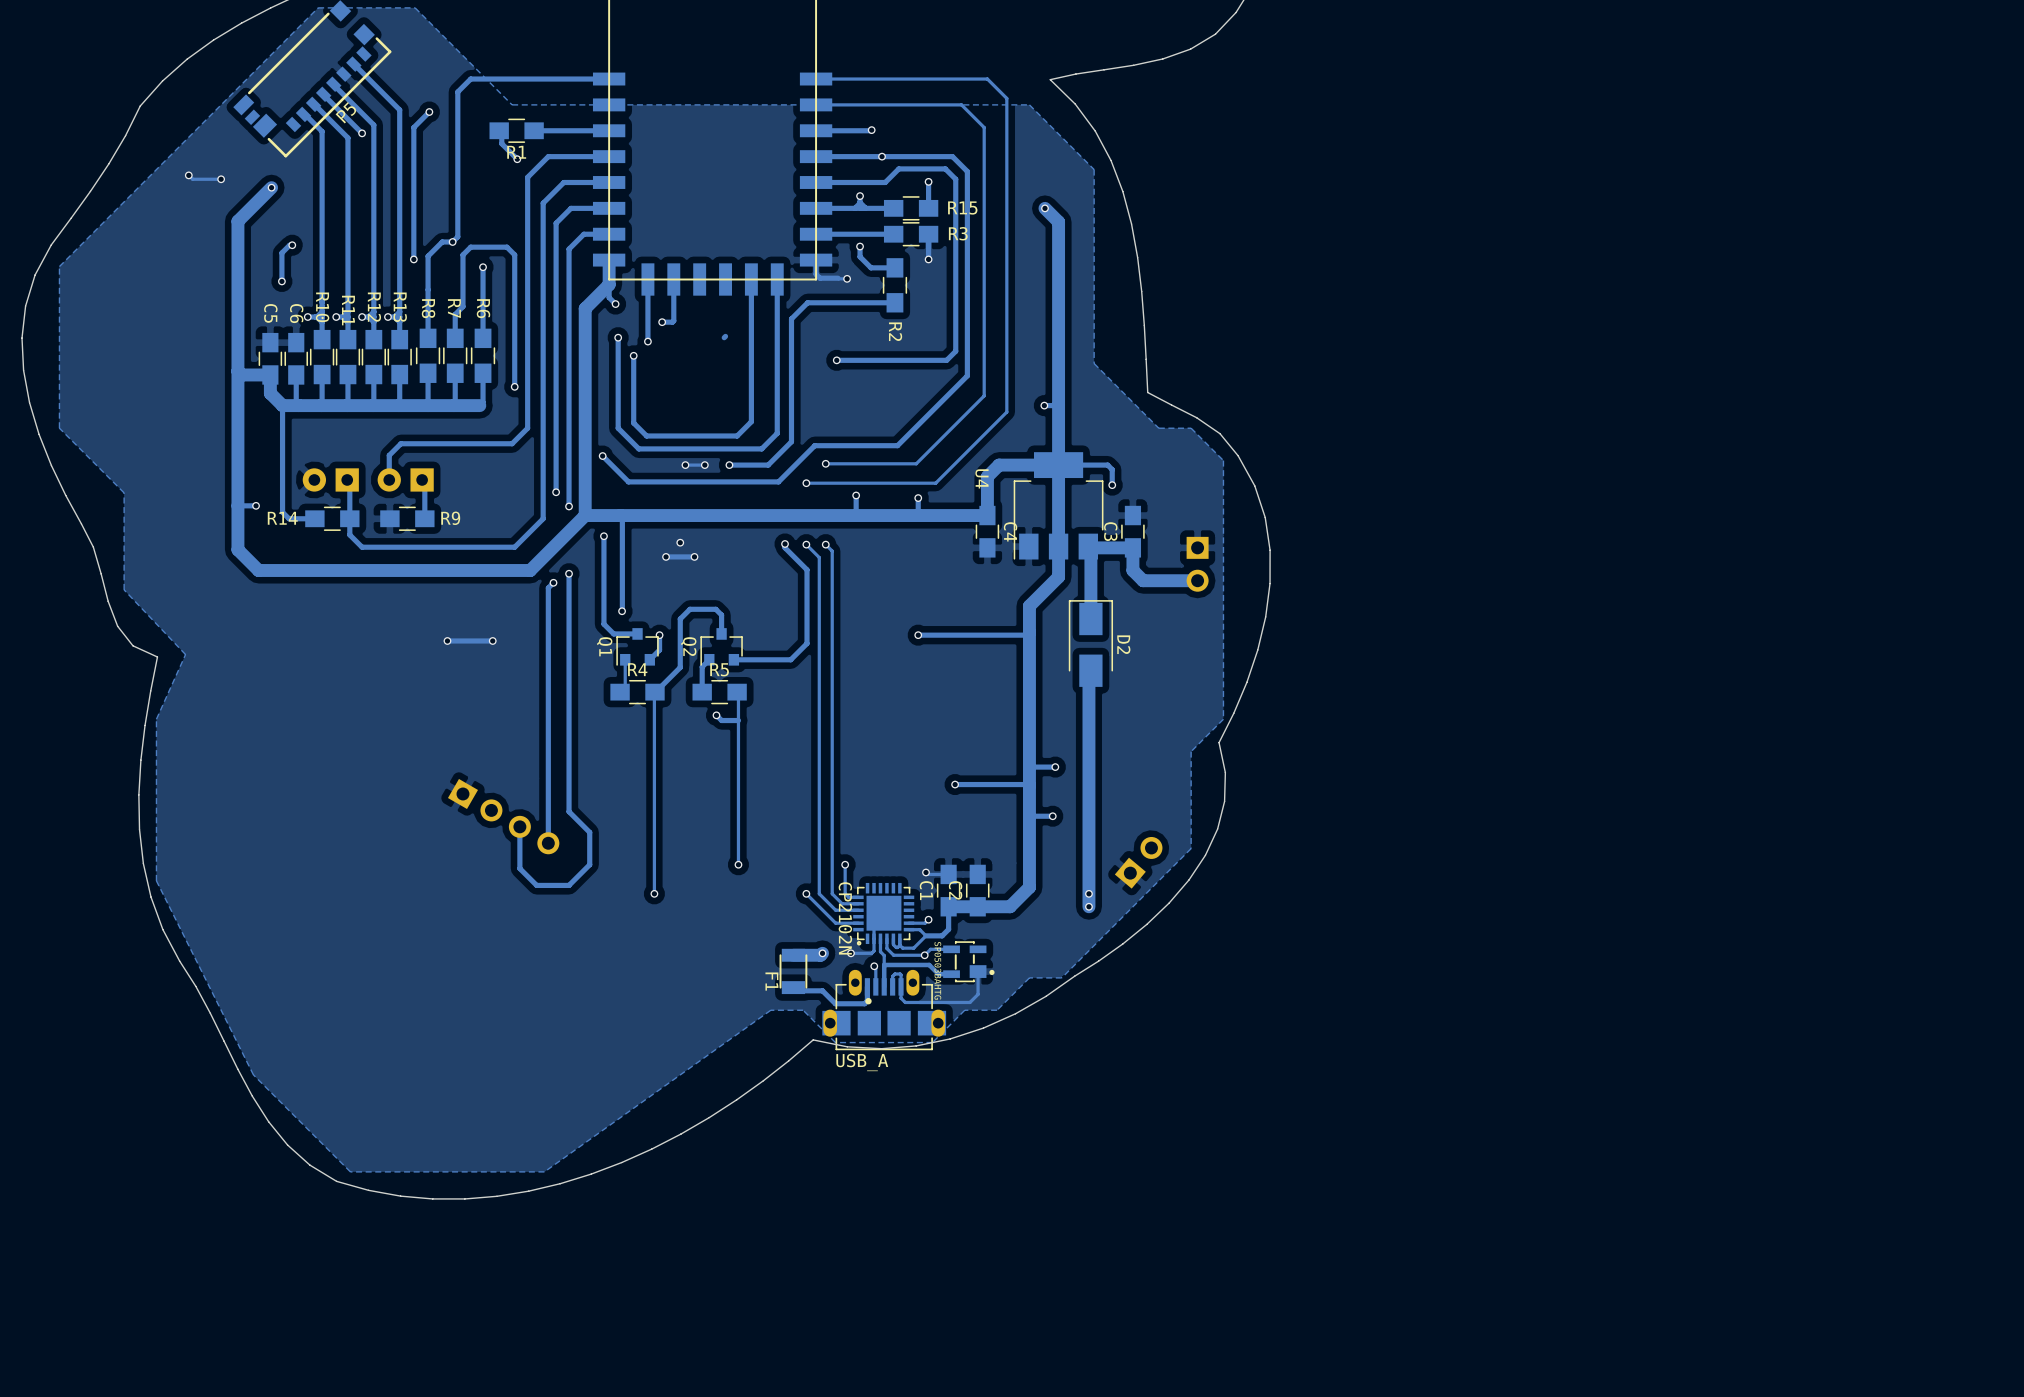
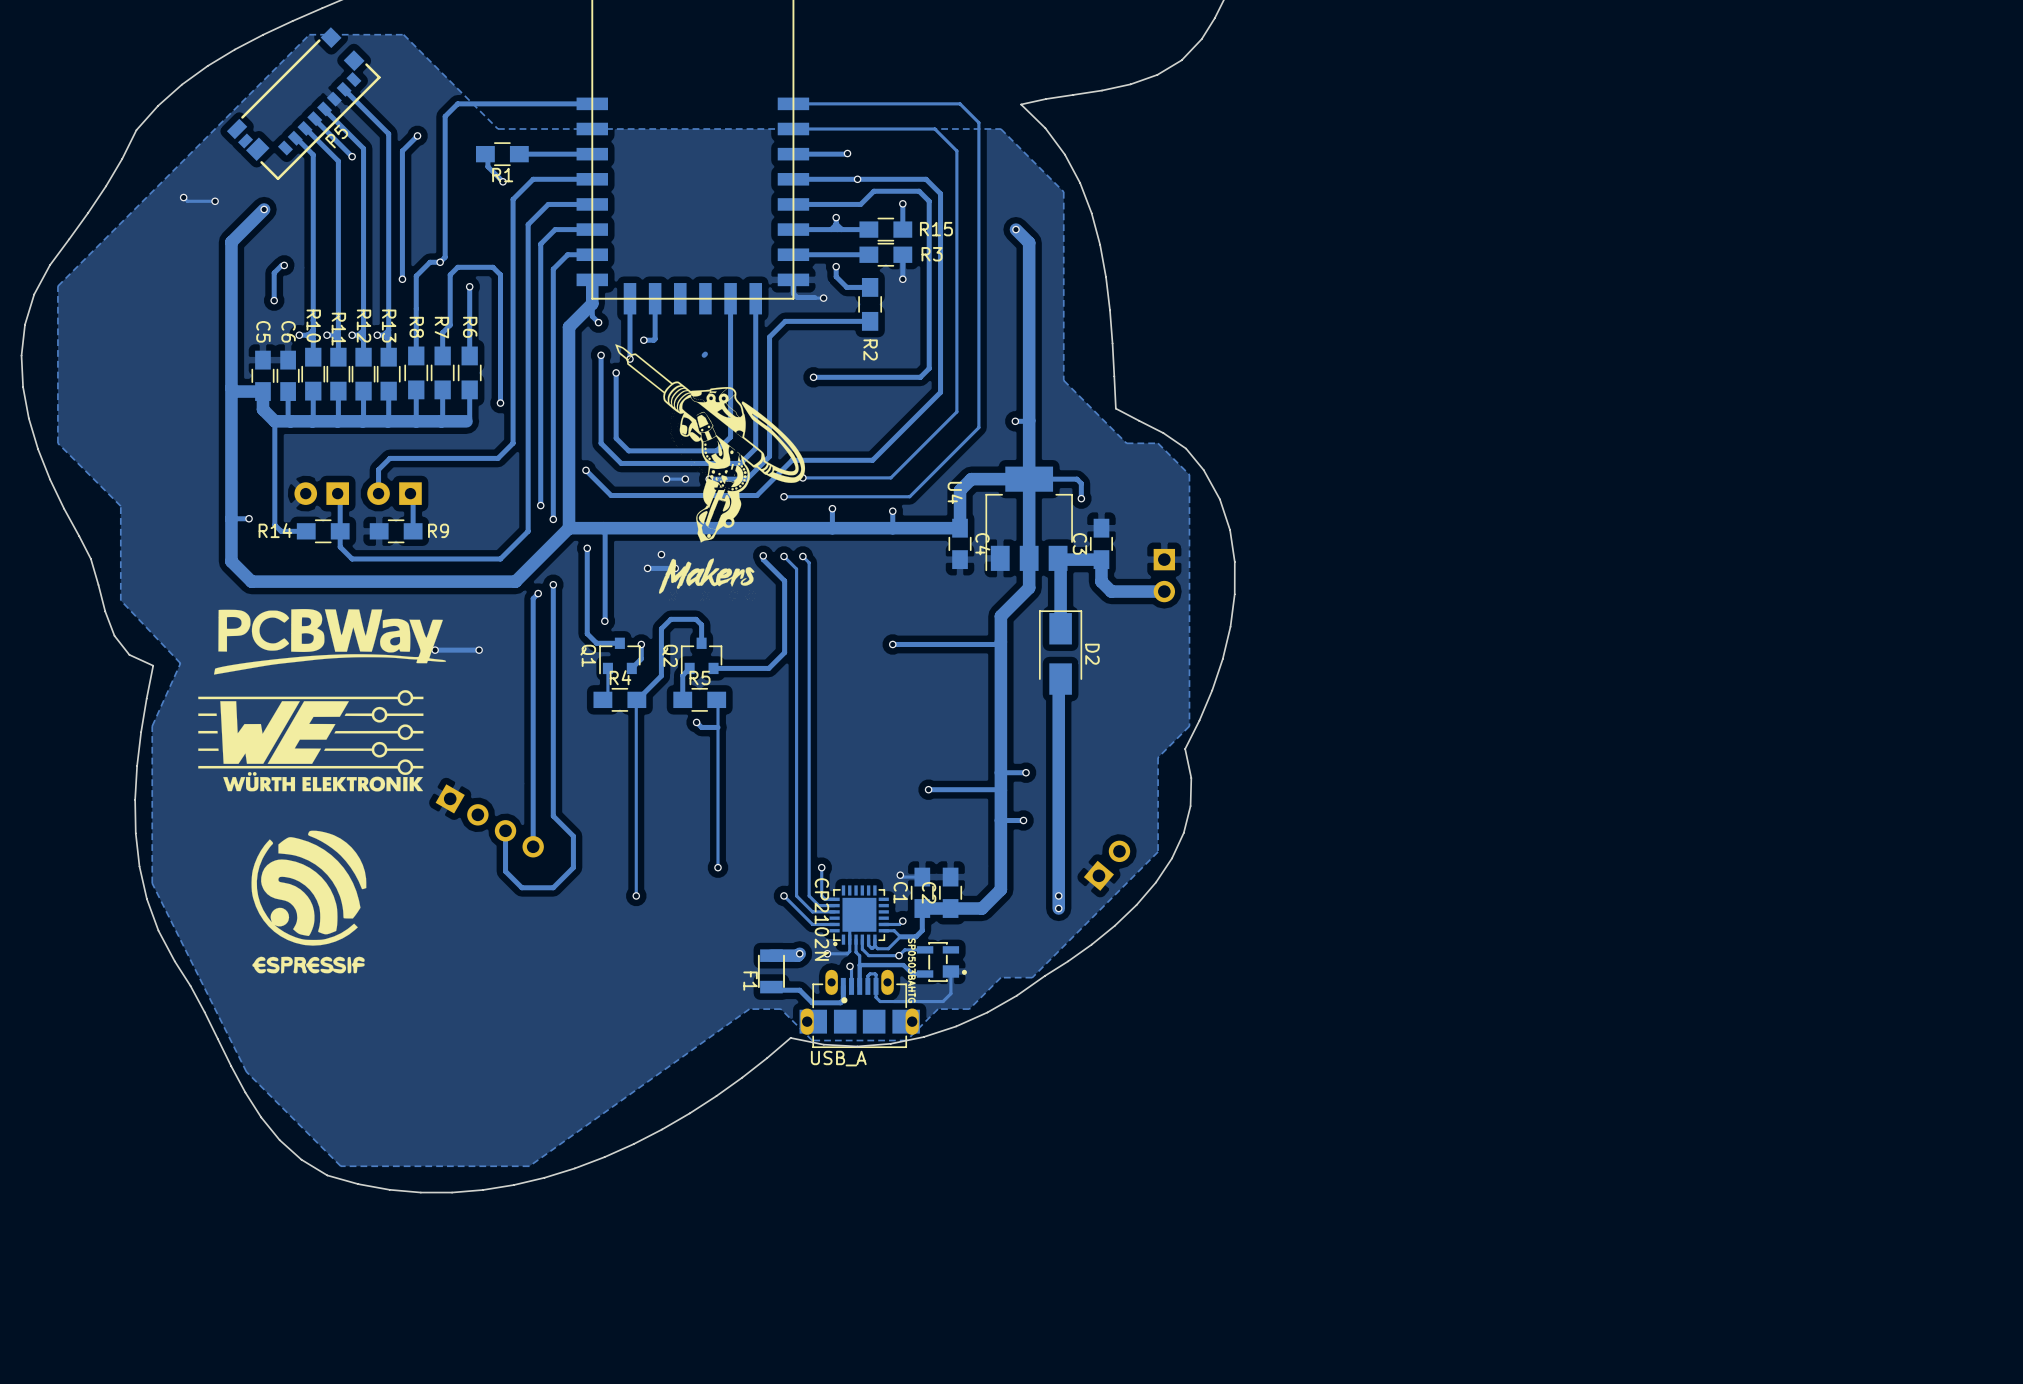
drawing: none -> [615, 344, 806, 601]
drawing: none -> [214, 609, 447, 675]
drawing: none -> [198, 690, 424, 792]
drawing: none -> [251, 830, 367, 974]

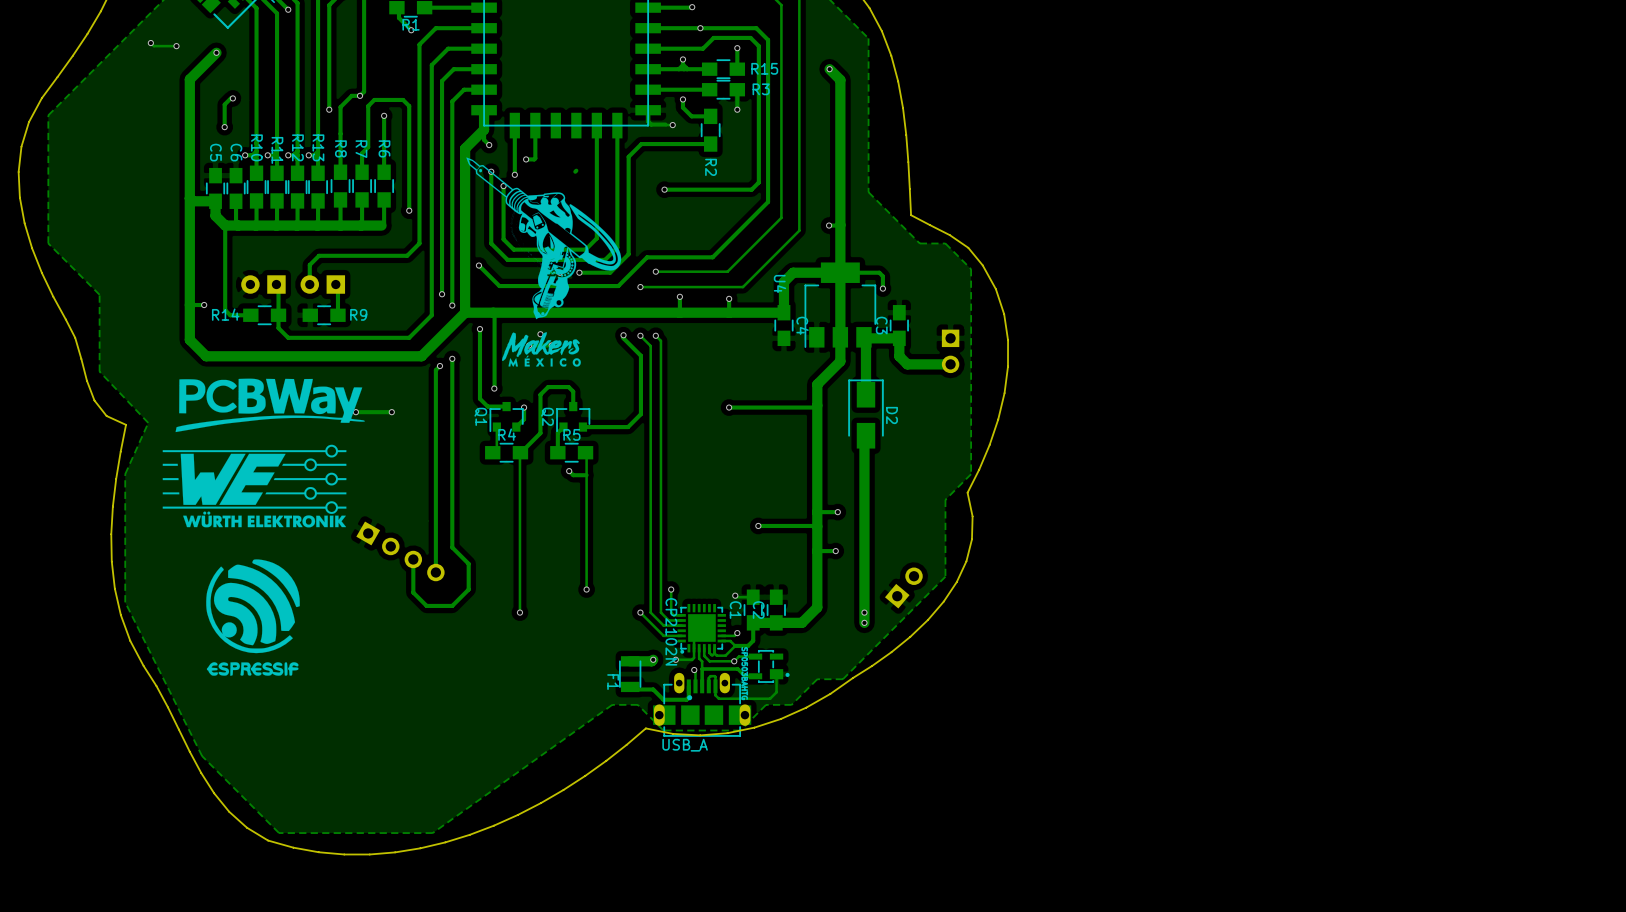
drawing: none -> [466, 157, 622, 367]
drawing: [615, 344, 806, 601] -> none

